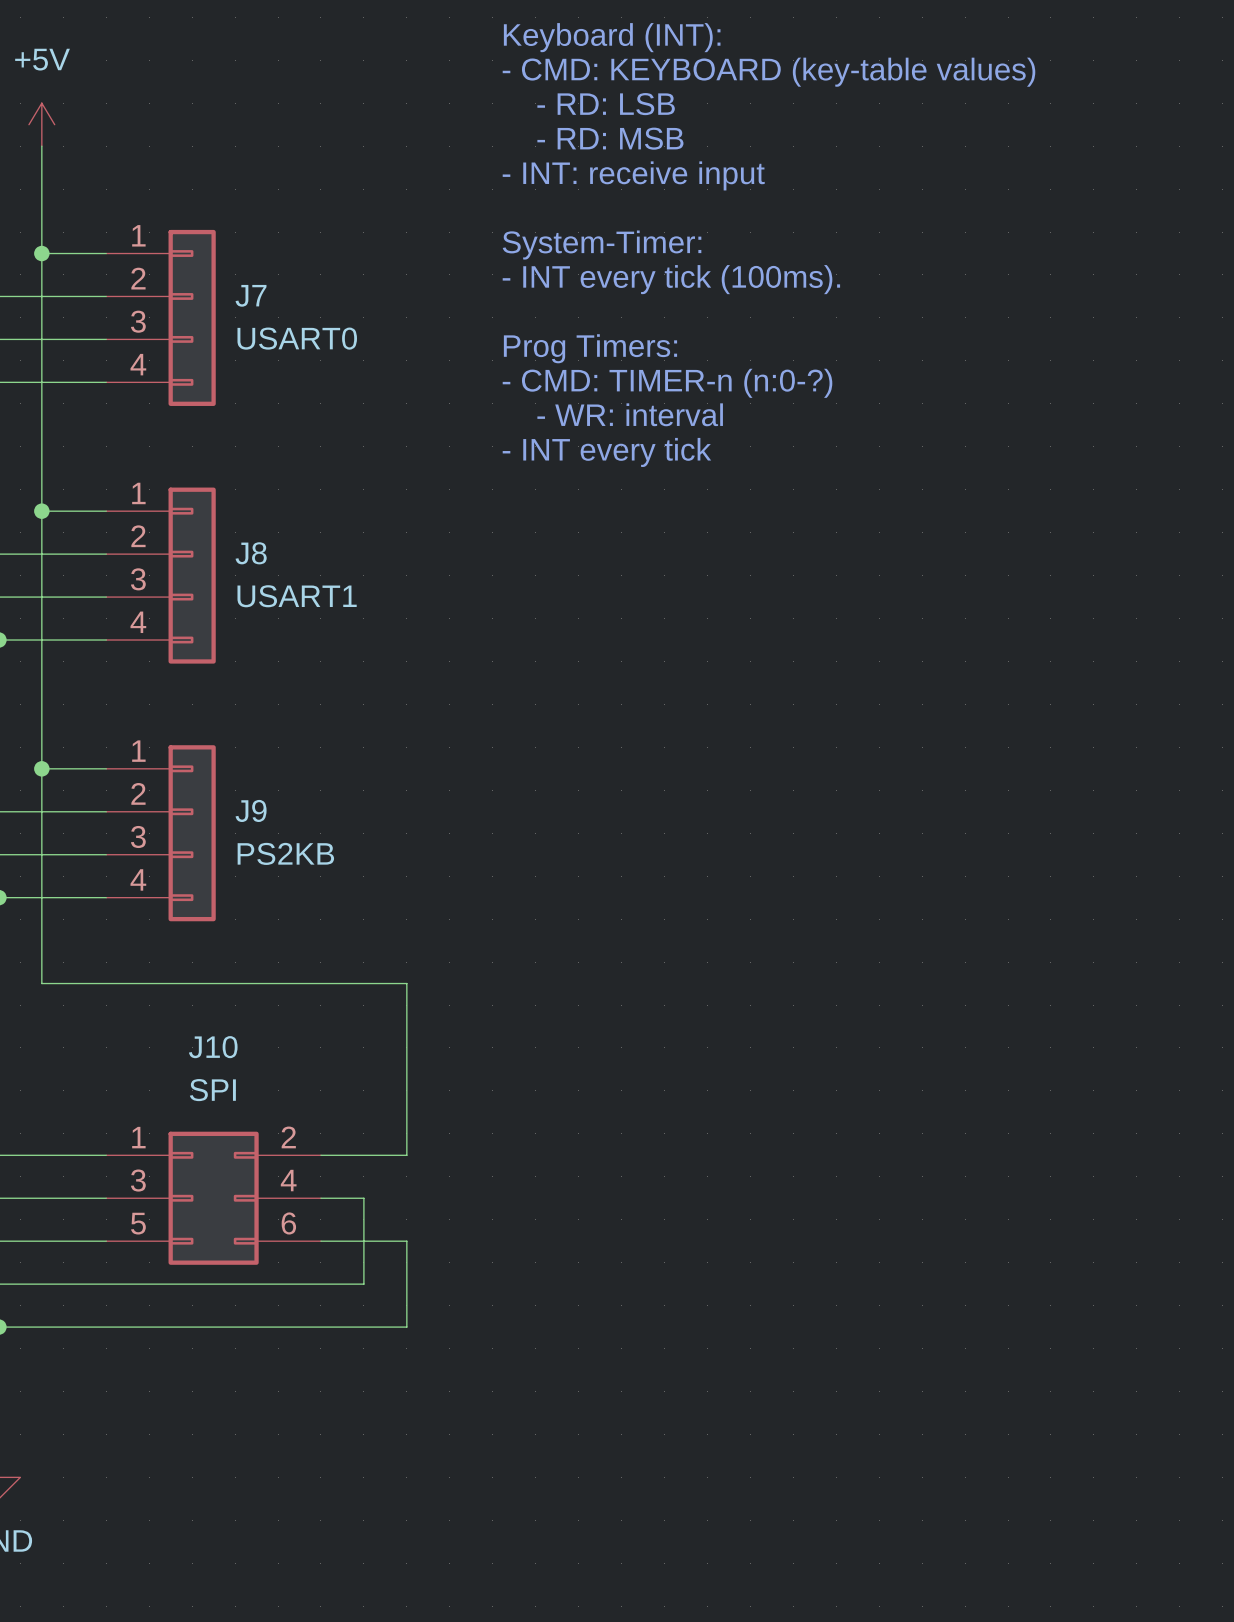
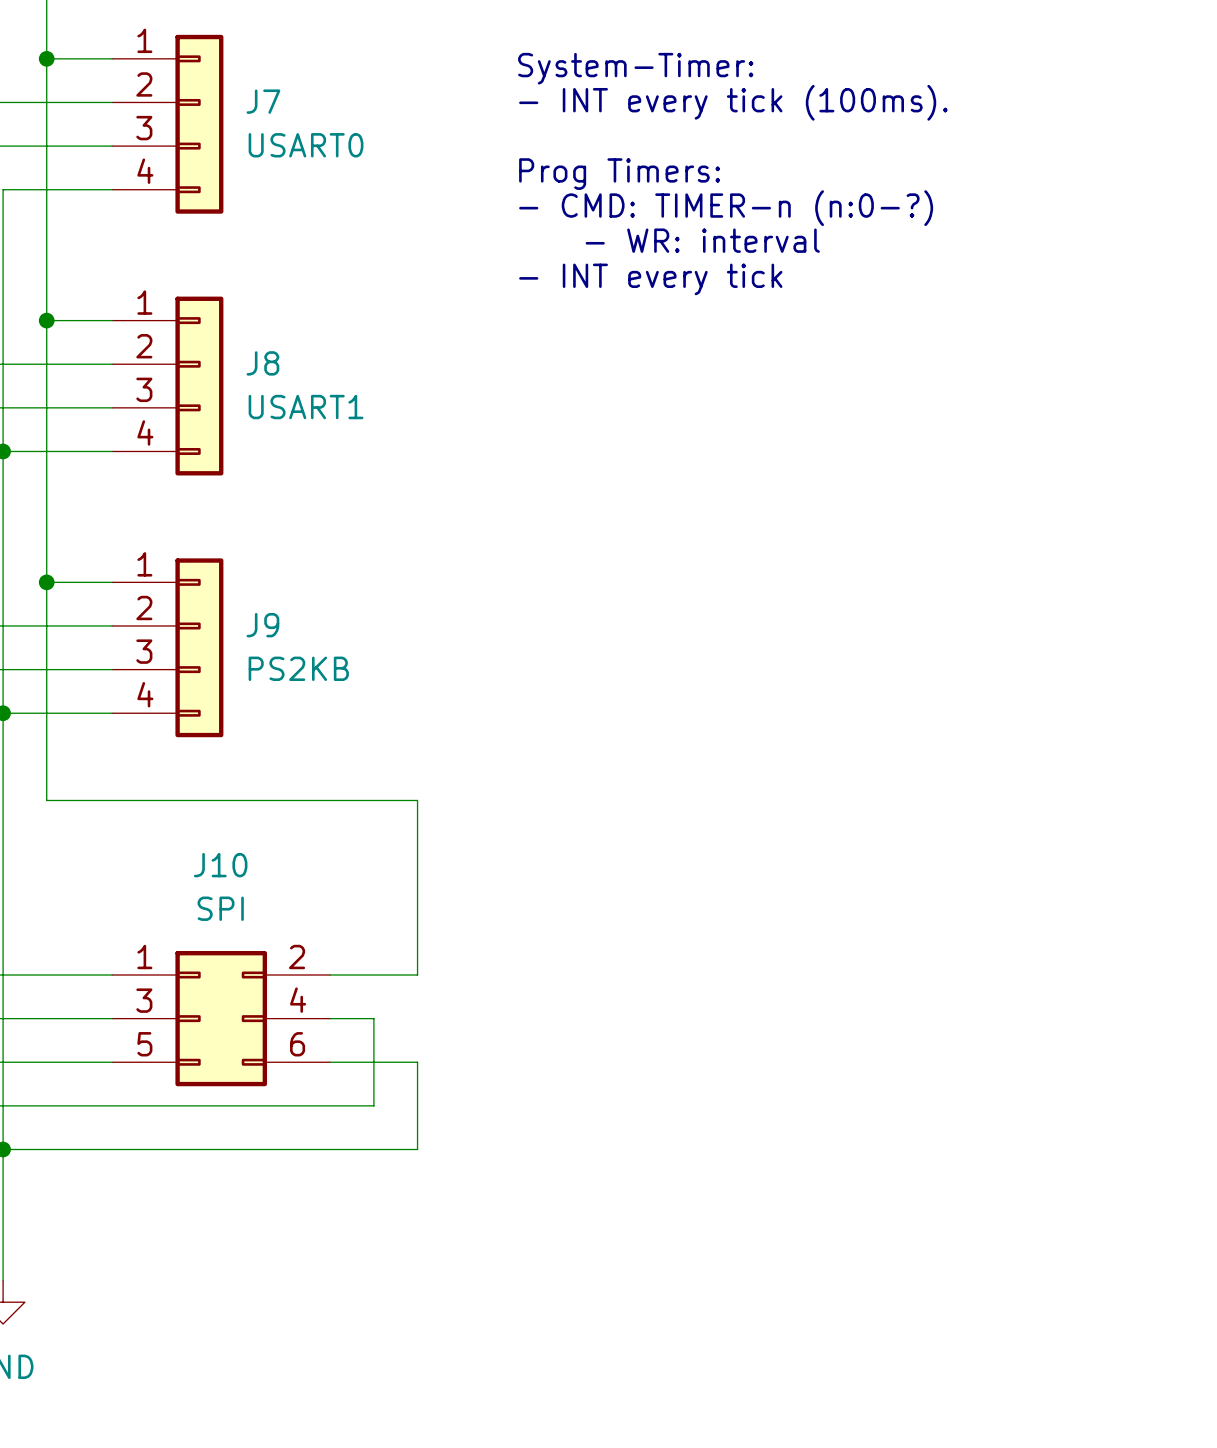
text position: System-Timer: (602, 245) -> System-Timer: (635, 68)
text position: - INT every tick (100ms). (671, 279) -> - INT every tick (100ms). (733, 102)
text position: Prog Timers: (590, 348) -> Prog Timers: (619, 174)
text position: - CMD: TIMER-n (n:0-?) (667, 383) -> - CMD: TIMER-n (n:0-?) (726, 208)
text position: - WR: interval (630, 414) -> - WR: interval (702, 240)
text position: - INT every tick (606, 452) -> - INT every tick (650, 279)

